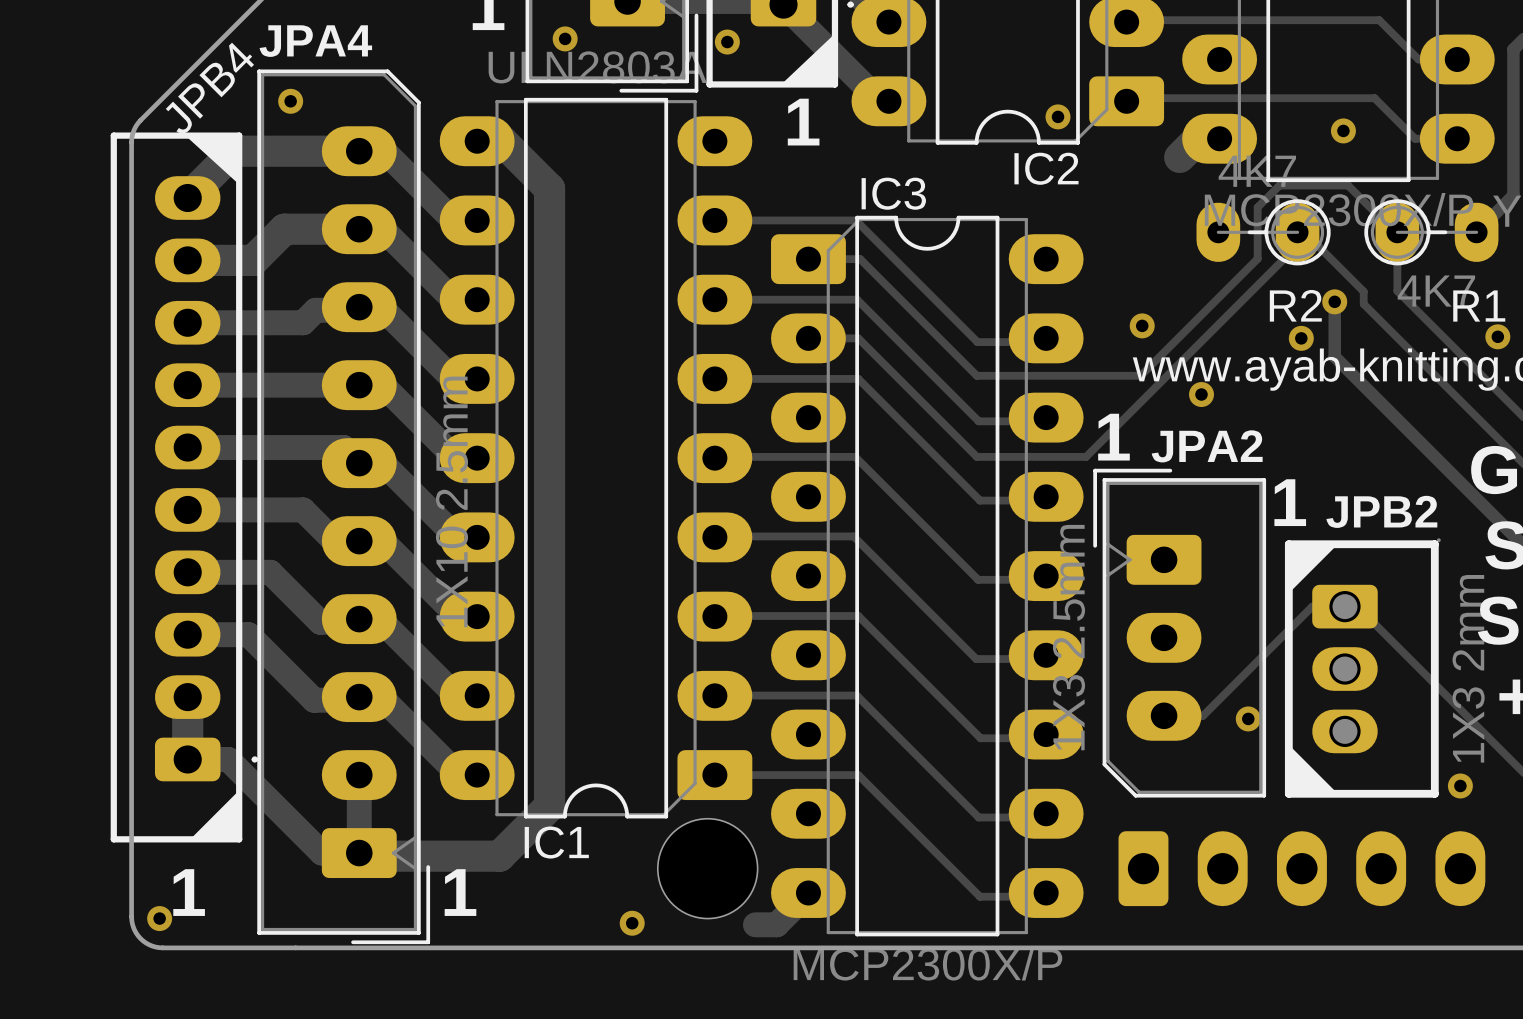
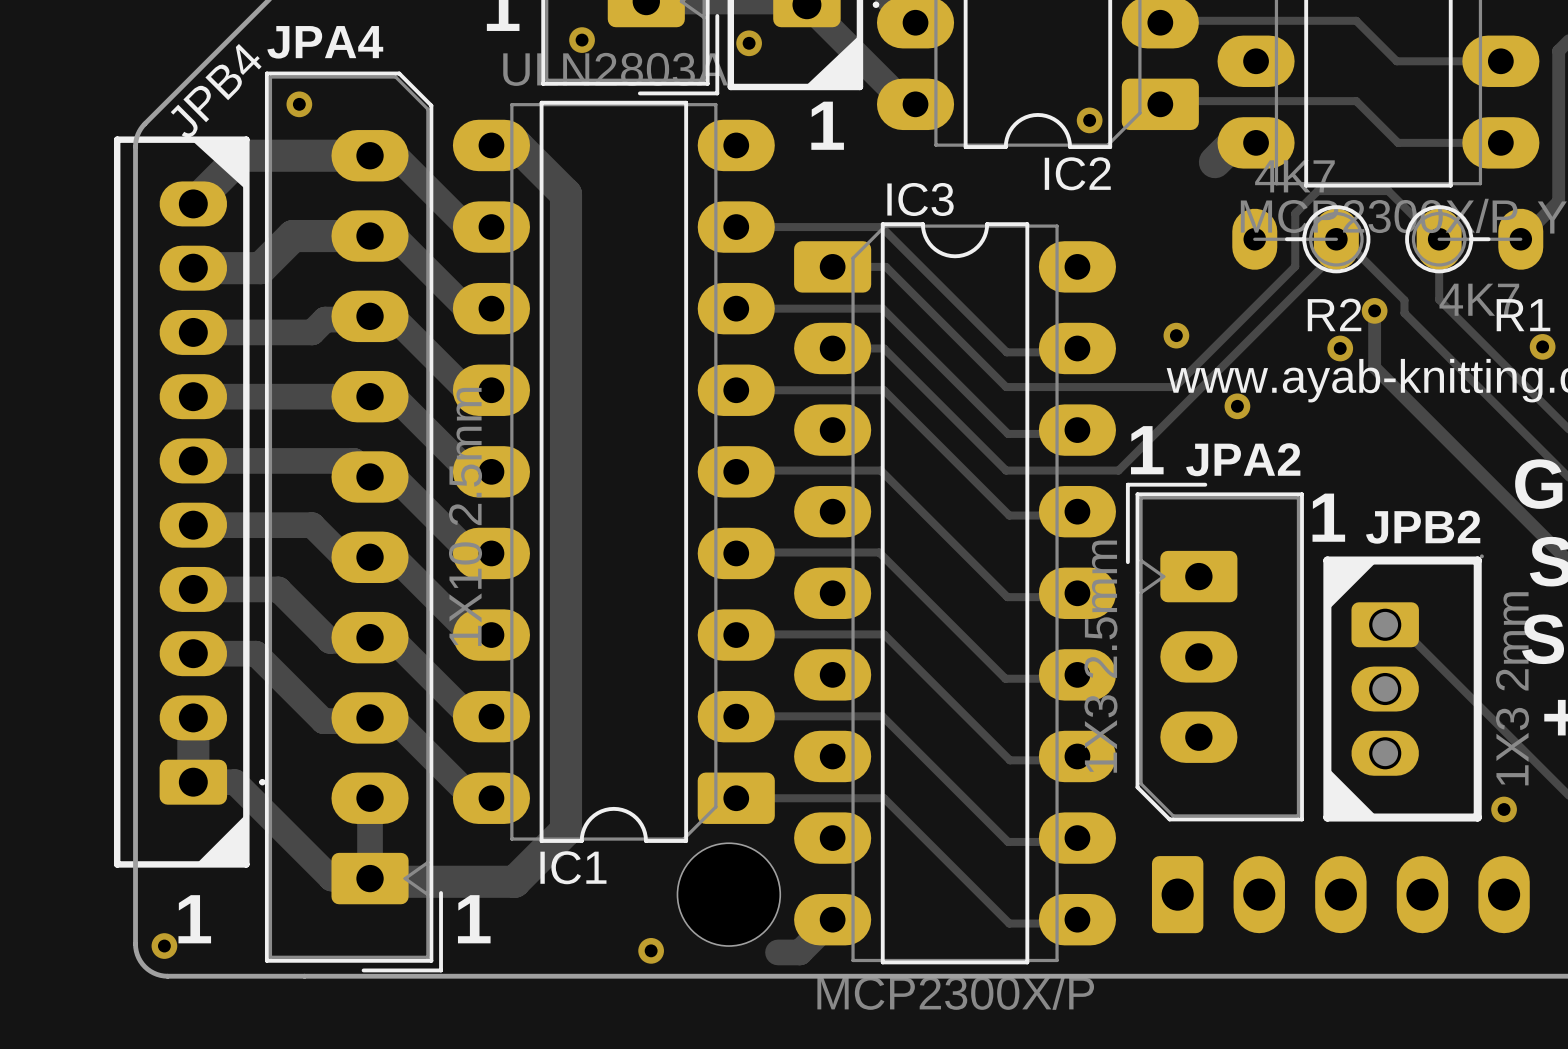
track: (1316, 20) (1379, 20) (1418, 59) -> (1356, 20) (1396, 61) (1461, 61)
track: (1316, 98) (1374, 98) (1415, 138) -> (1356, 101) (1398, 142) (1457, 142)
via: (1343, 130) -> none
track: (1335, 606) (1312, 606) (1203, 715) (1164, 715) -> none
via: (1248, 718) -> none

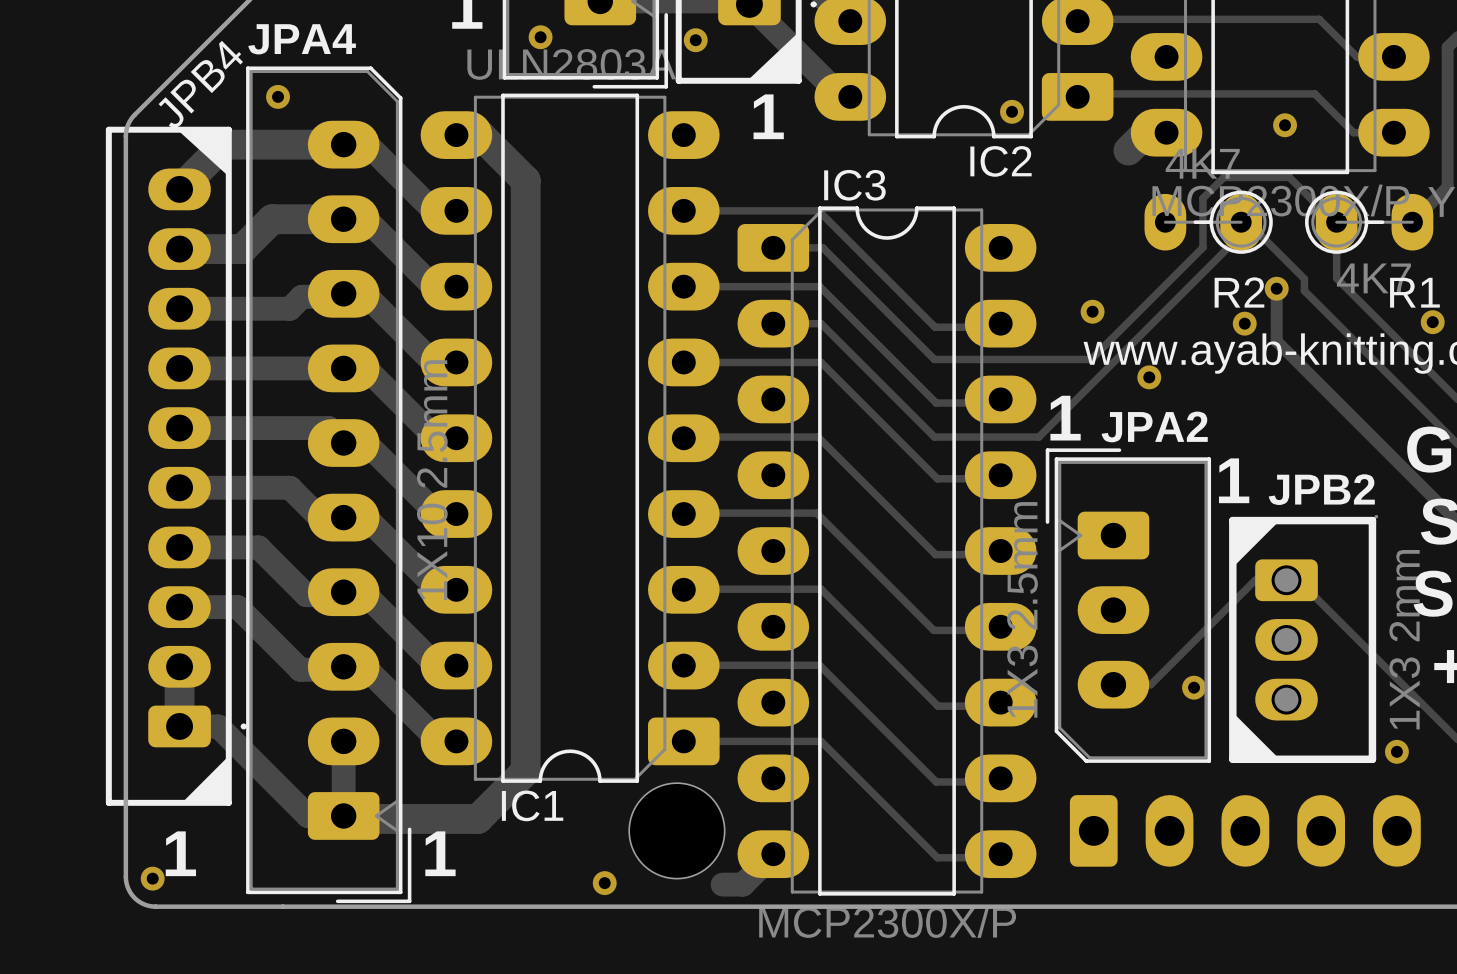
track: (1356, 20) (1396, 61) (1461, 61) -> (1259, 19) (1319, 19) (1356, 56)
track: (1356, 101) (1398, 142) (1457, 142) -> (1259, 93) (1314, 93) (1353, 132)
via: none -> (1285, 125)
track: none -> (1277, 580) (1255, 580) (1150, 684) (1113, 684)
via: none -> (1194, 687)

